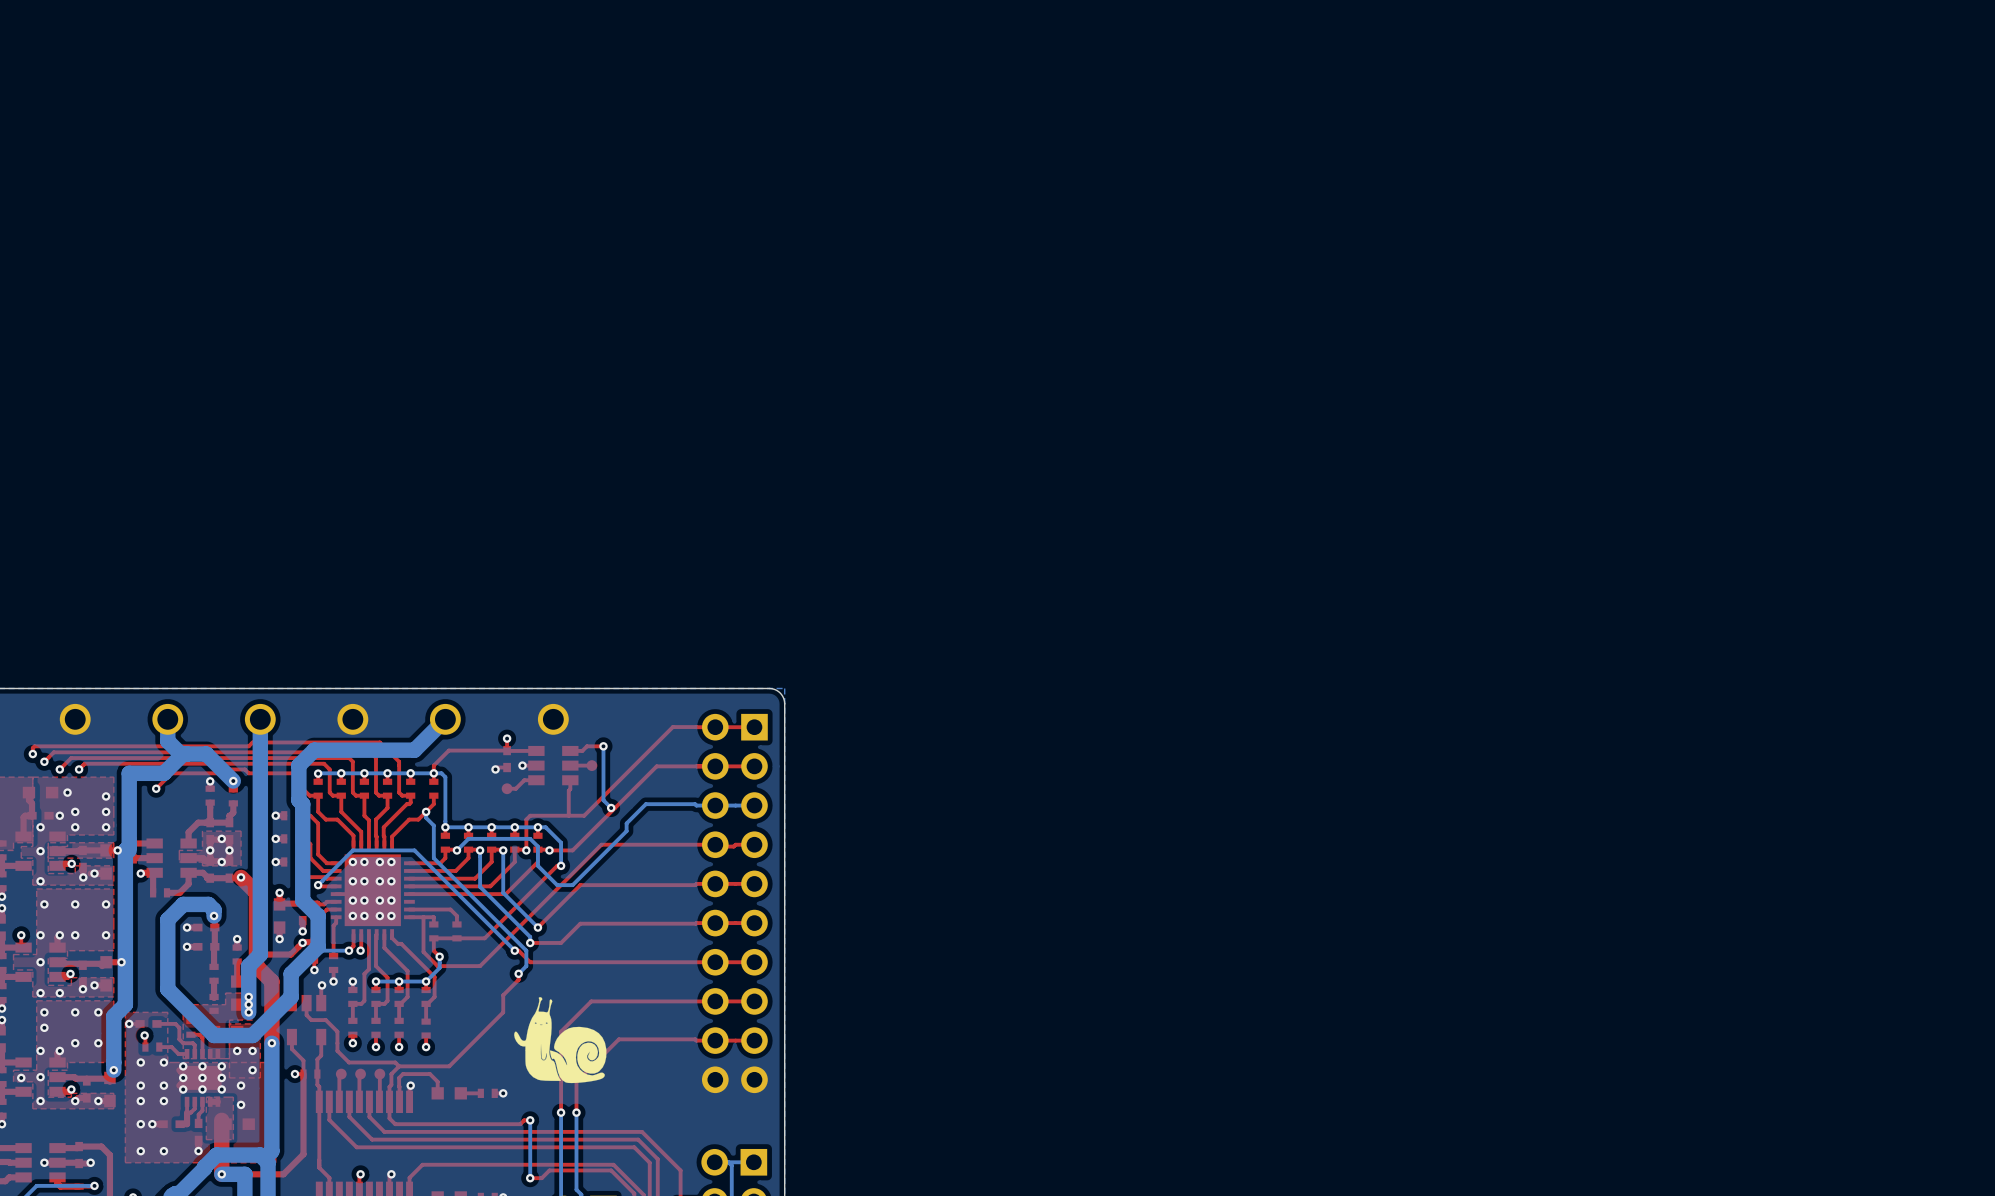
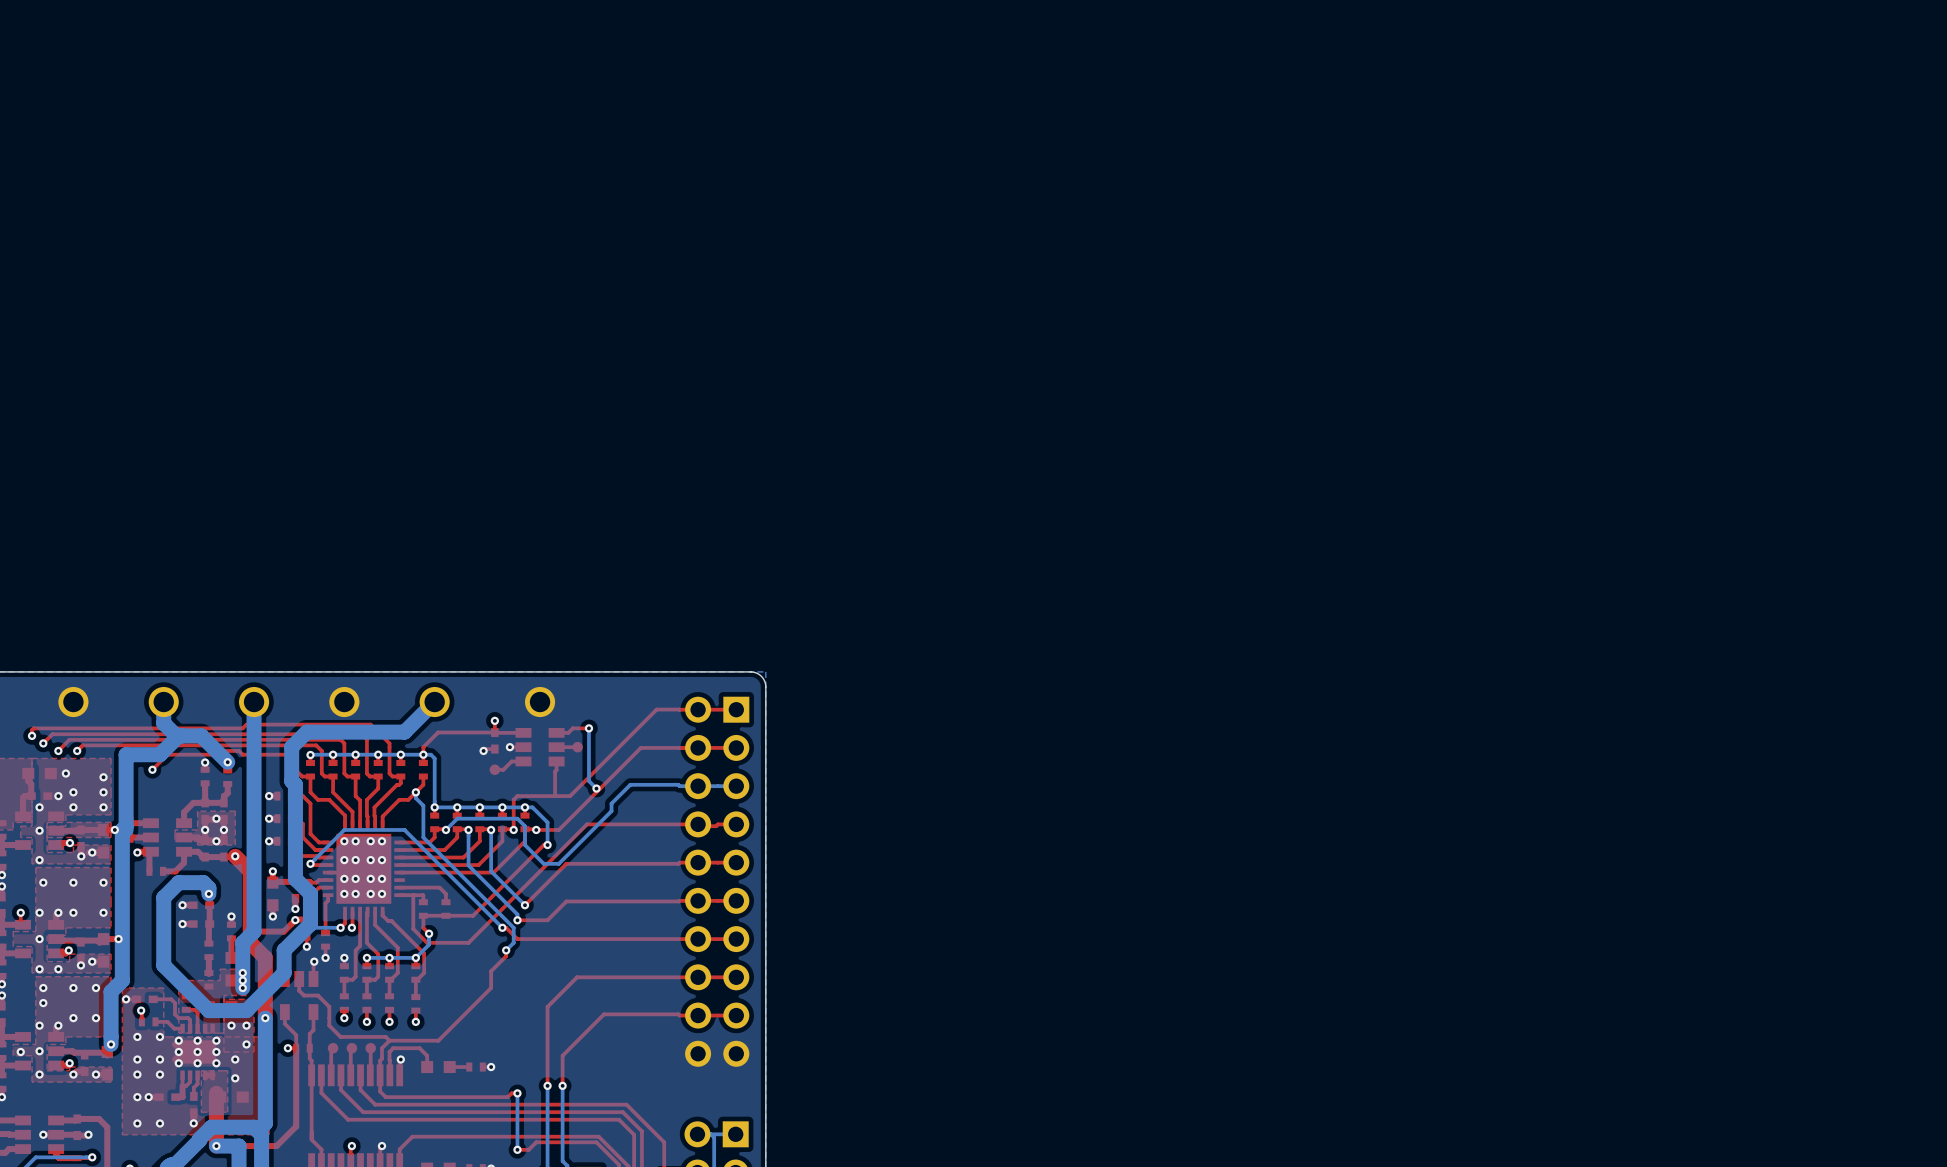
drawing: [514, 997, 607, 1084] -> none

